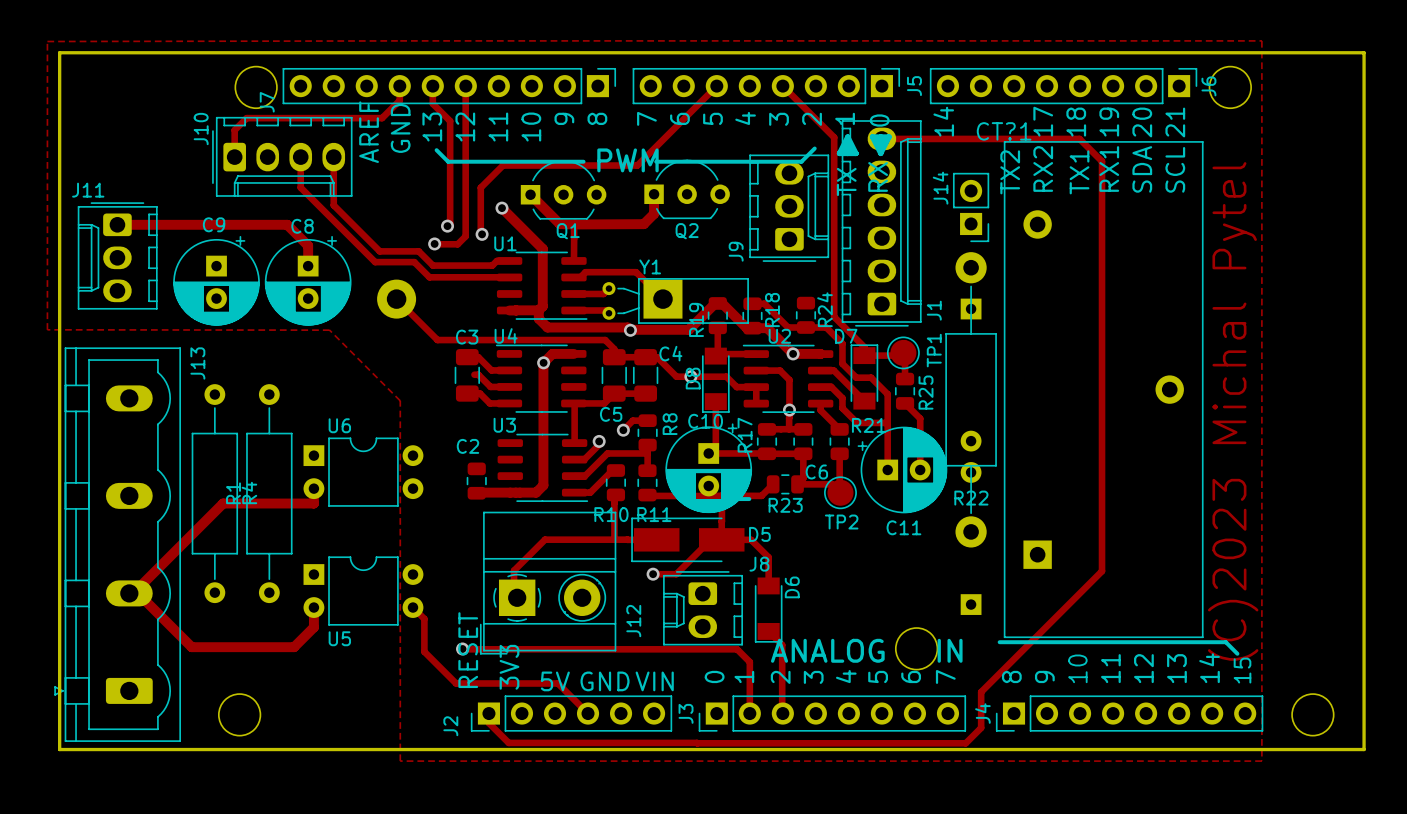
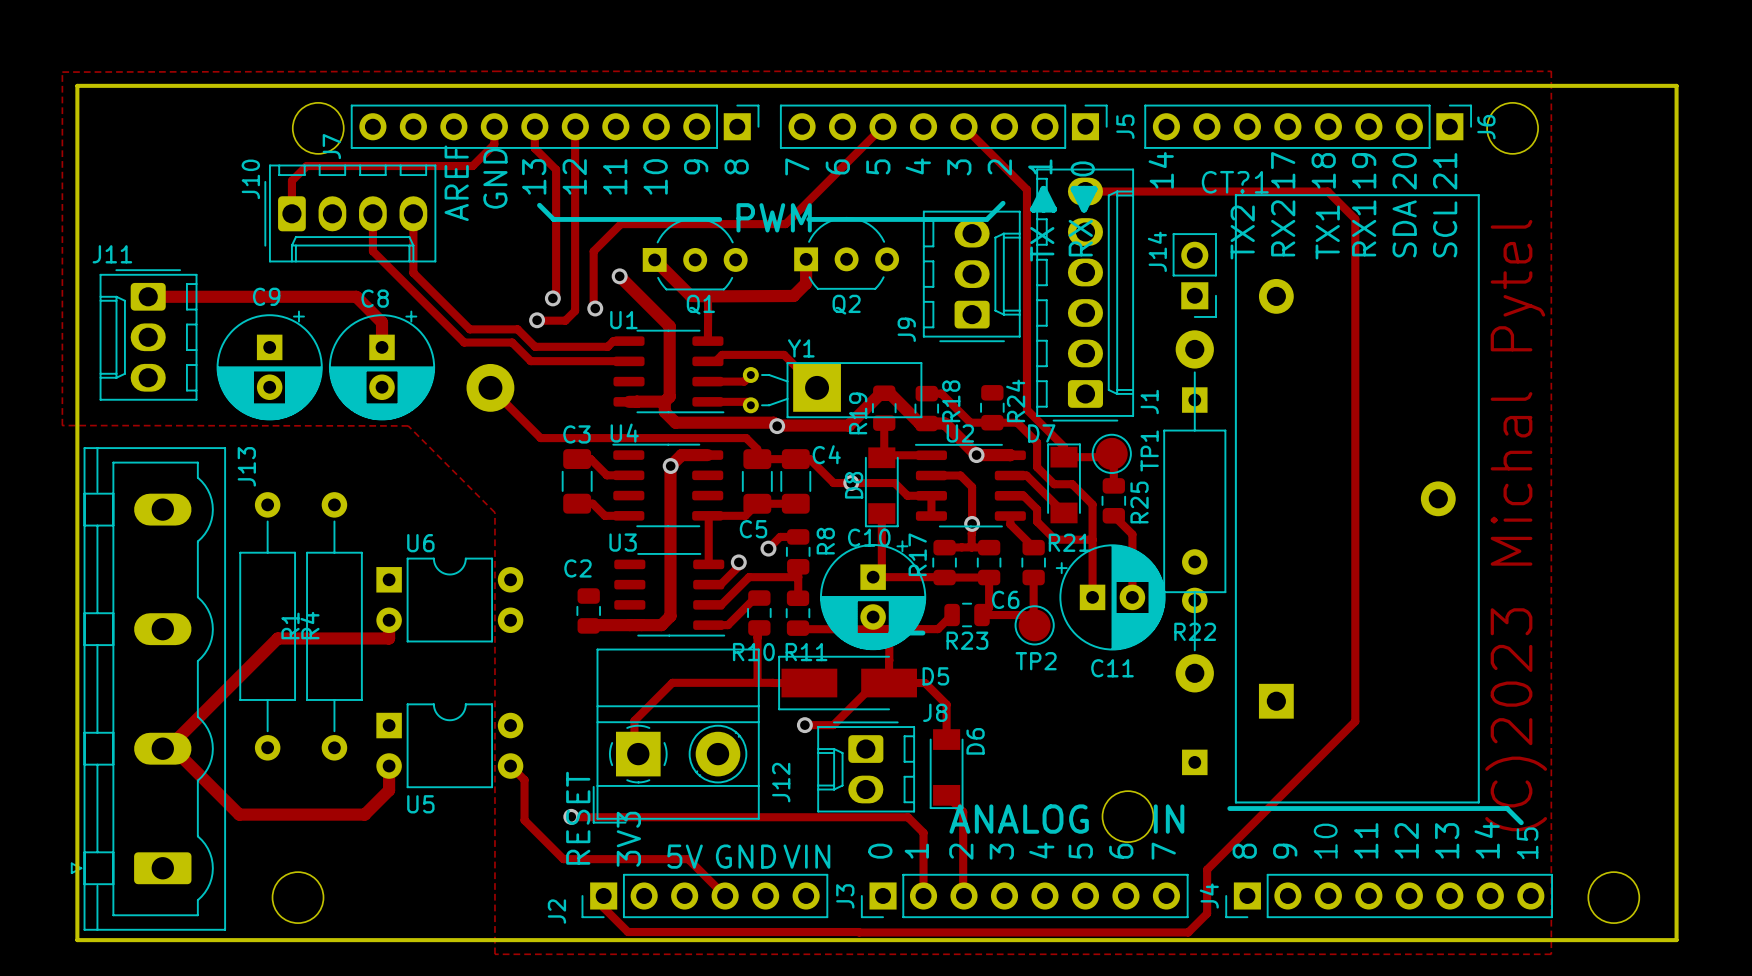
track: (474, 374) (478, 374) (490, 386) (509, 386) -> none

